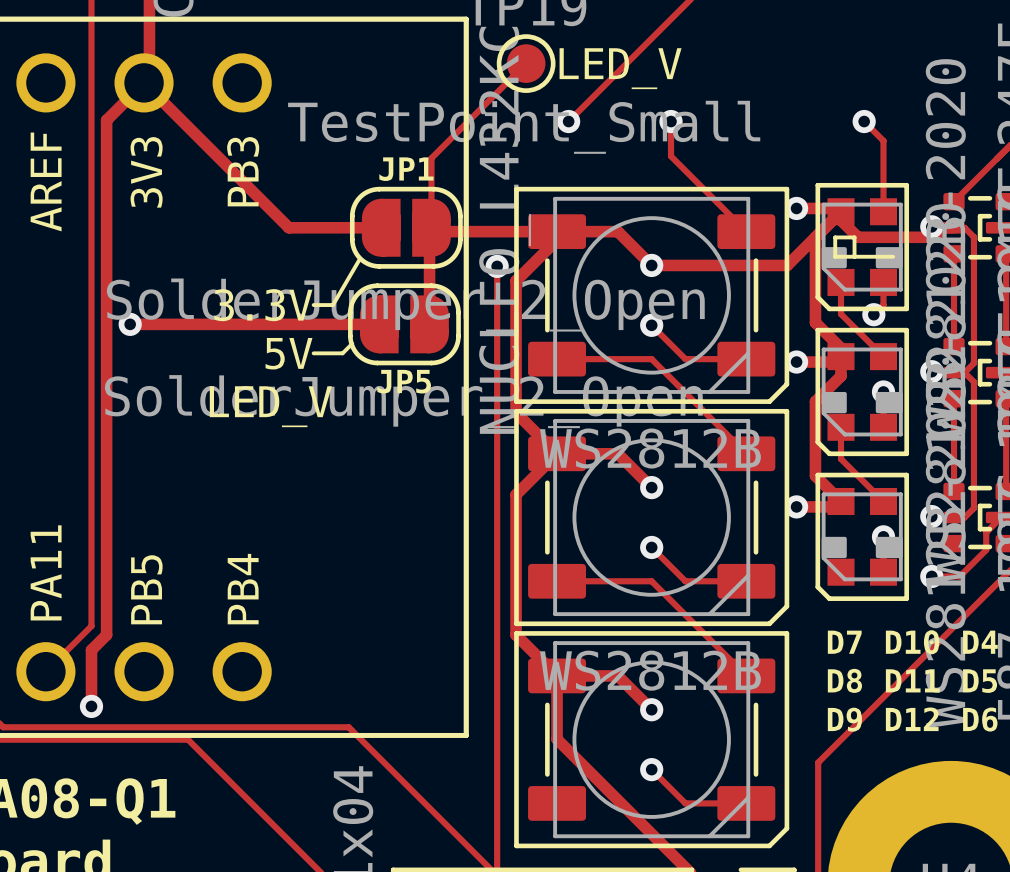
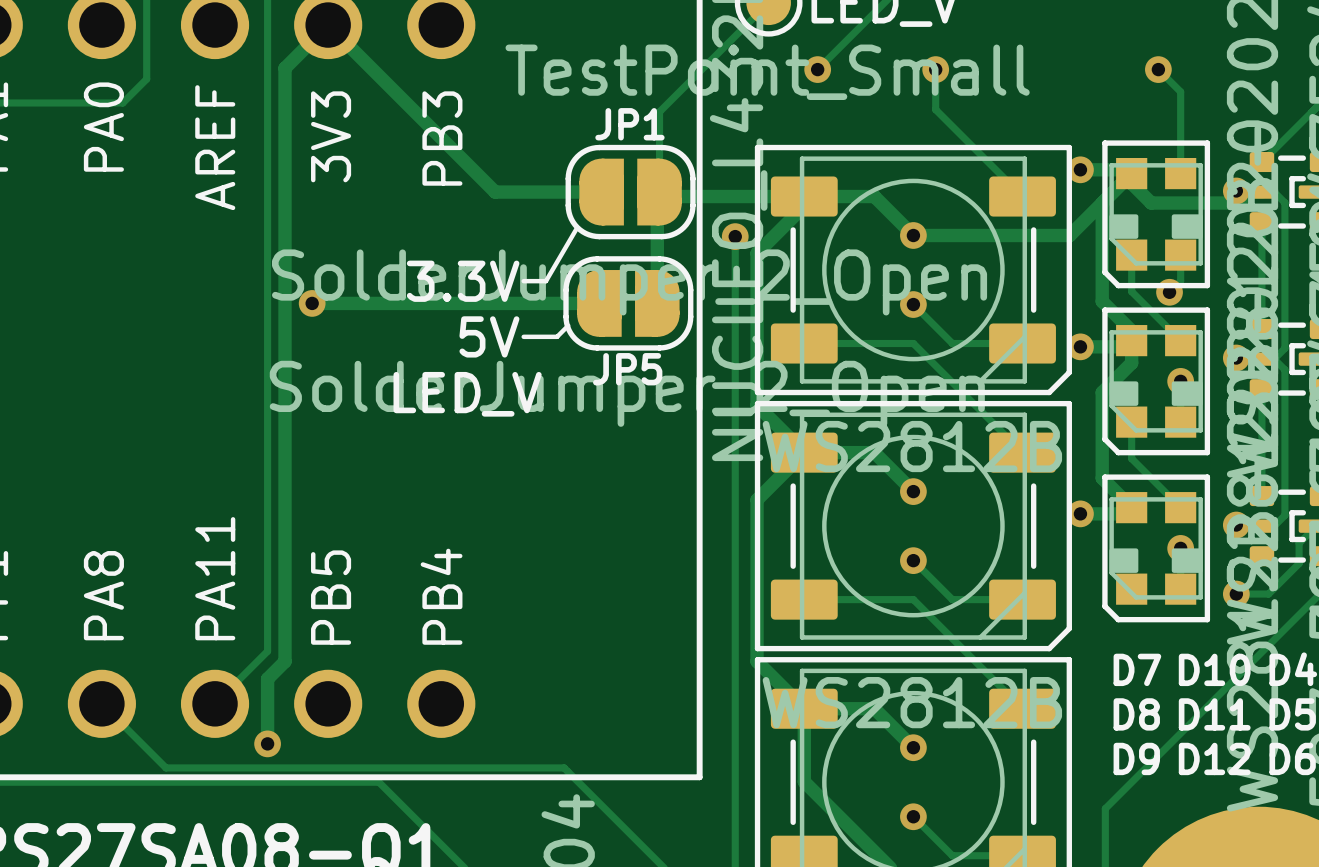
line: (854, 256) (854, 237) (835, 237) (835, 256) (893, 256) -> none

